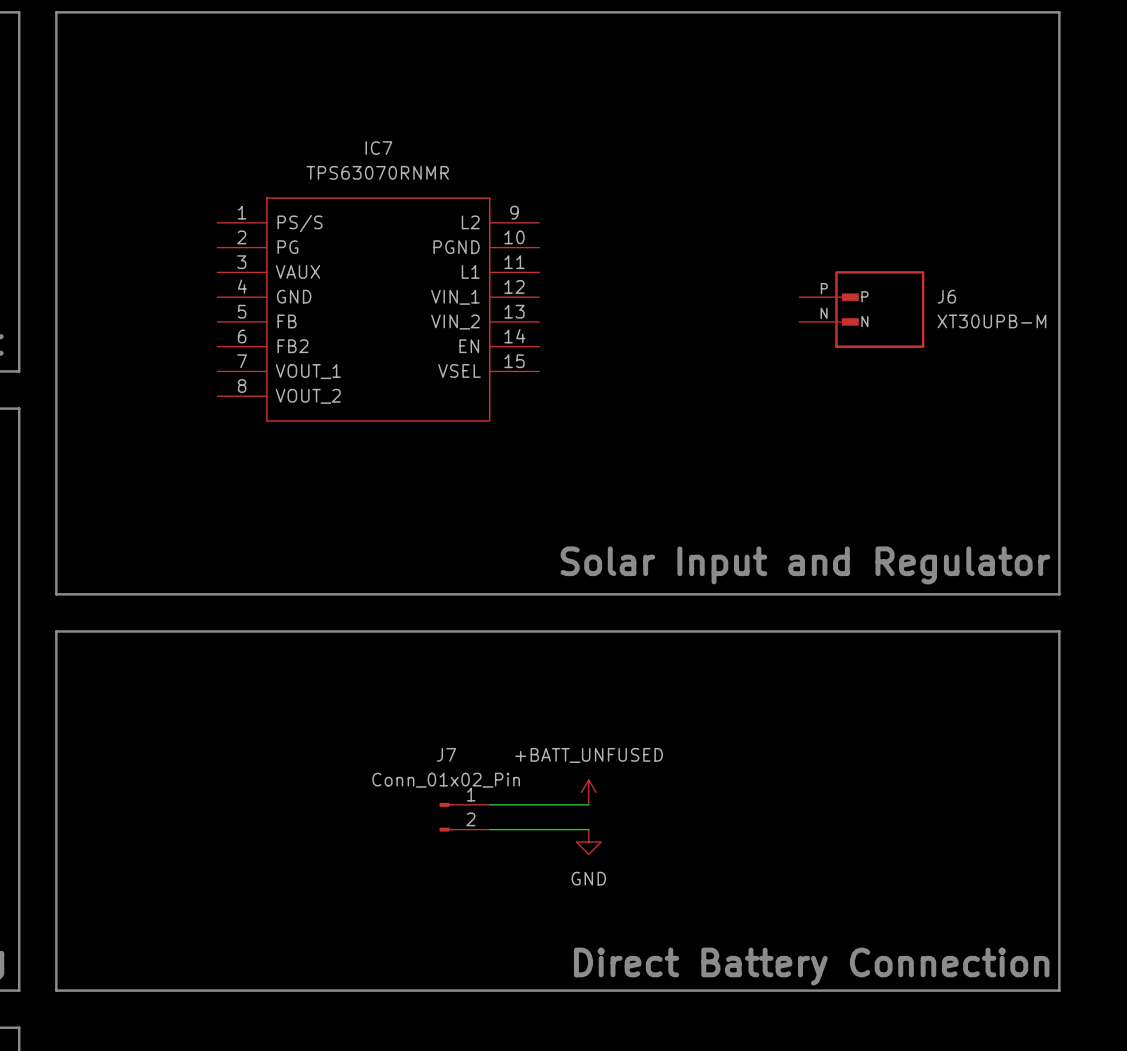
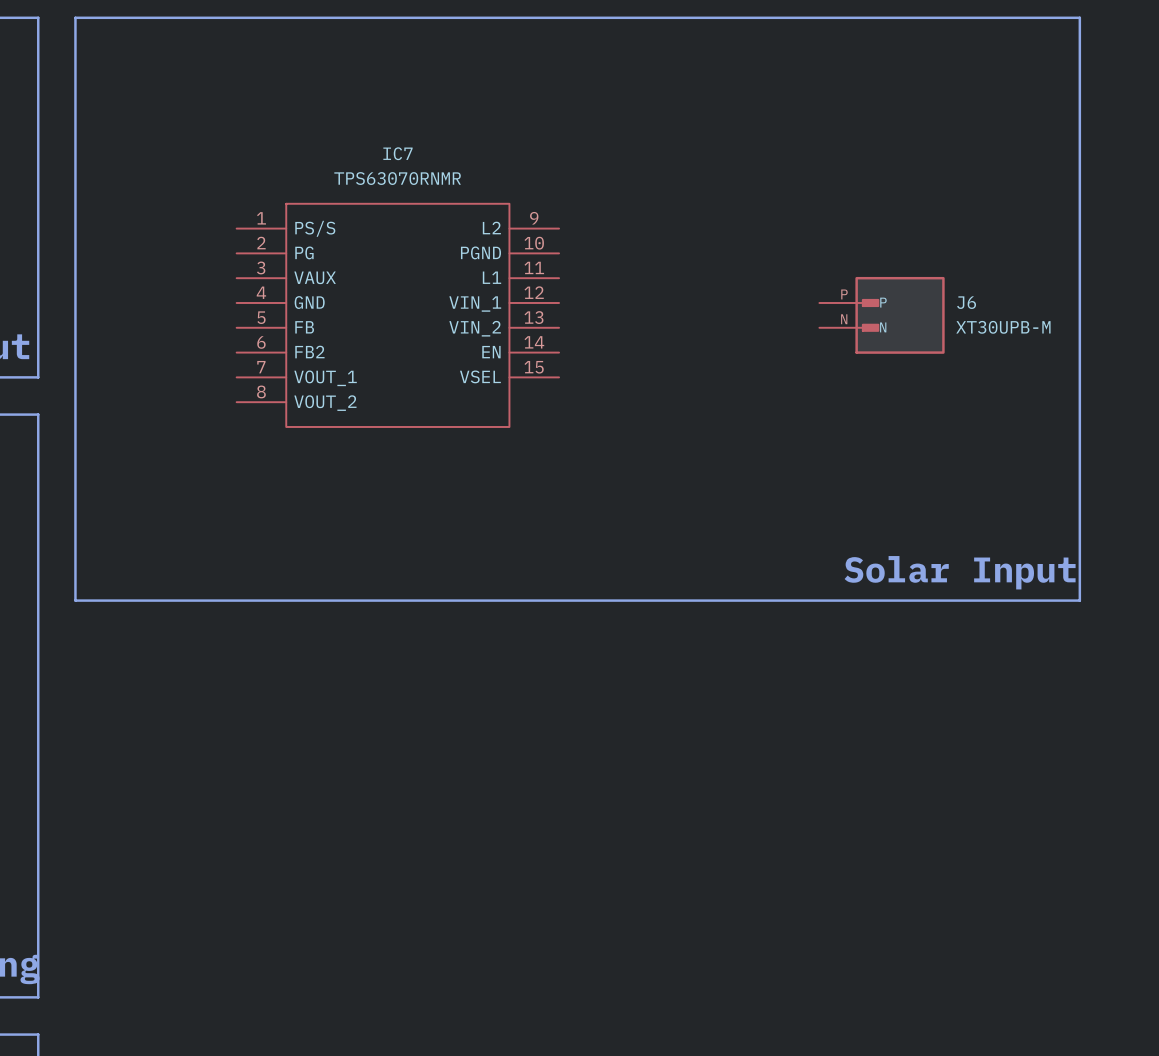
text: Solar Input and Regulator (805, 565) -> Solar Input (960, 572)
line: (56, 631) (1059, 631) (1059, 990) (56, 990) (56, 631) -> none
power symbol: +BATT_UNFUSED (588, 792) -> none
wire: (489, 804) (588, 804) -> none
J7: Conn_01x02_Pin (464, 817) -> none
wire: (489, 829) (588, 829) -> none
power symbol: GND (588, 841) -> none
text: Direct Battery Connection (811, 966) -> none

